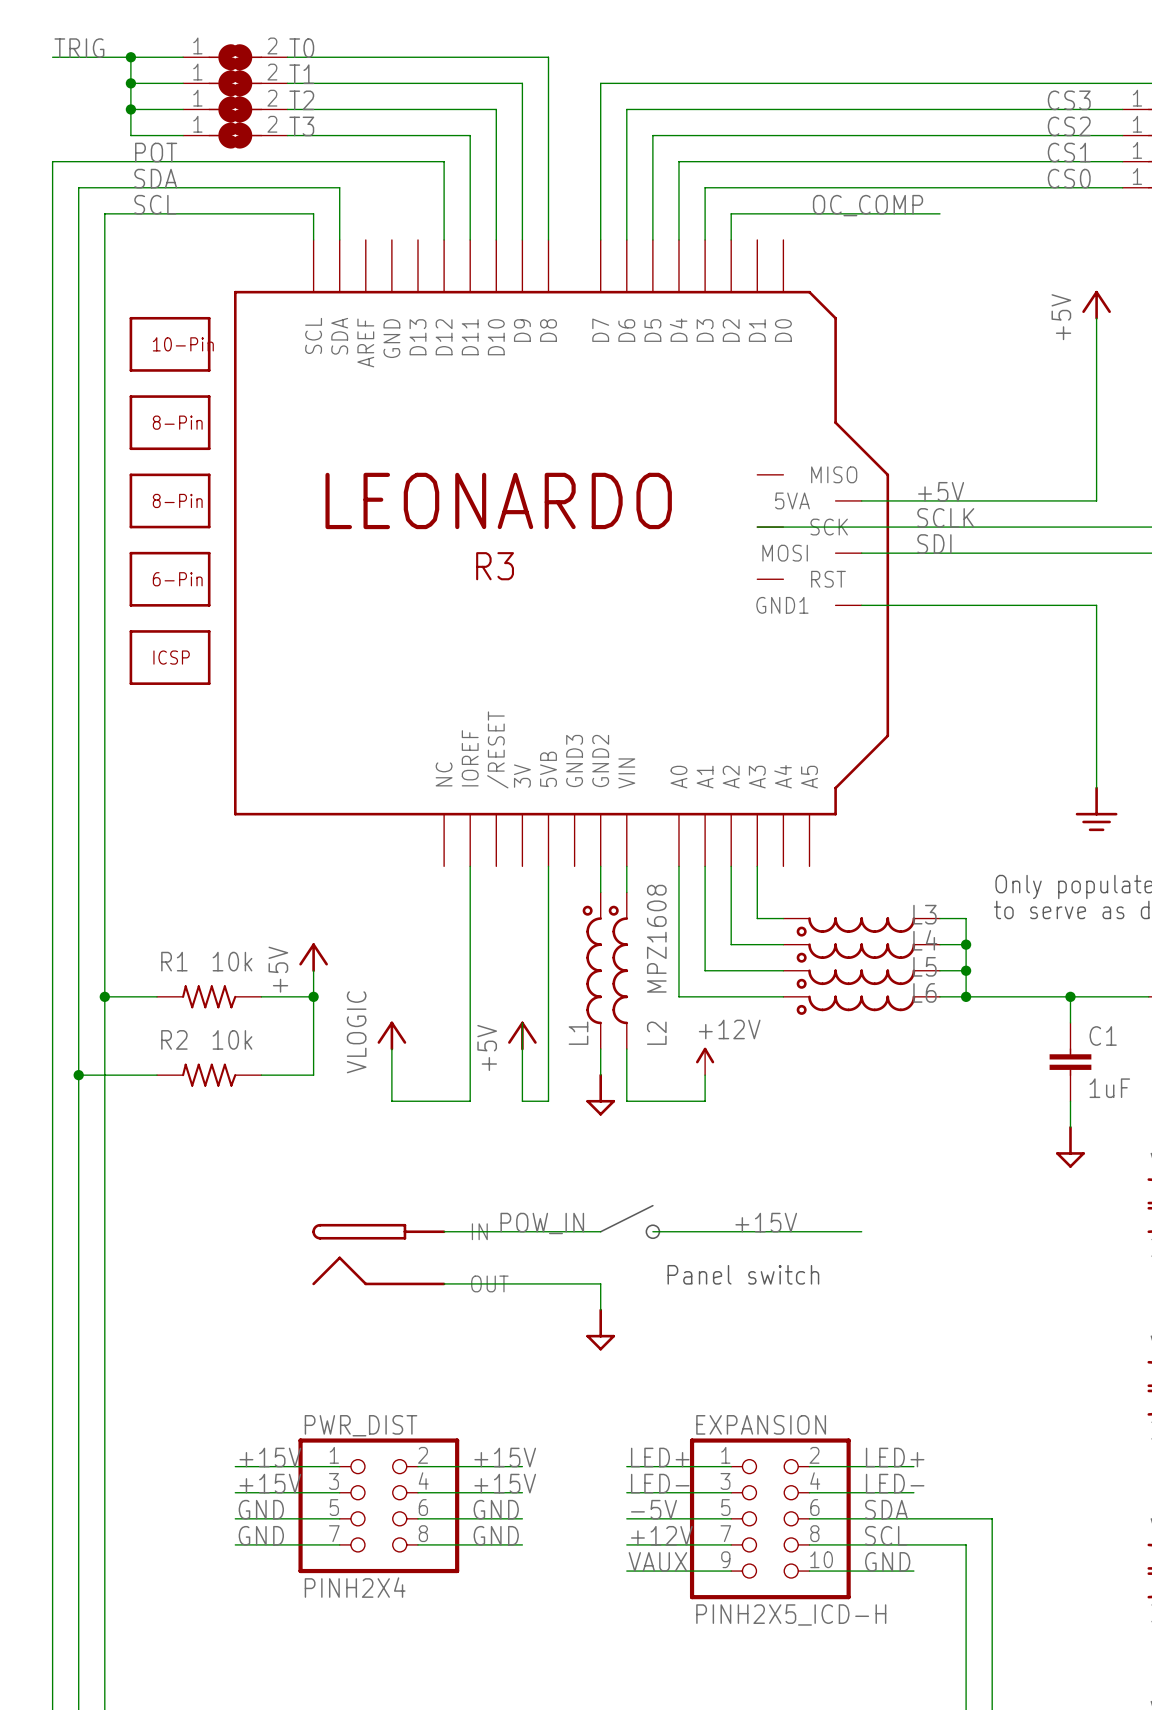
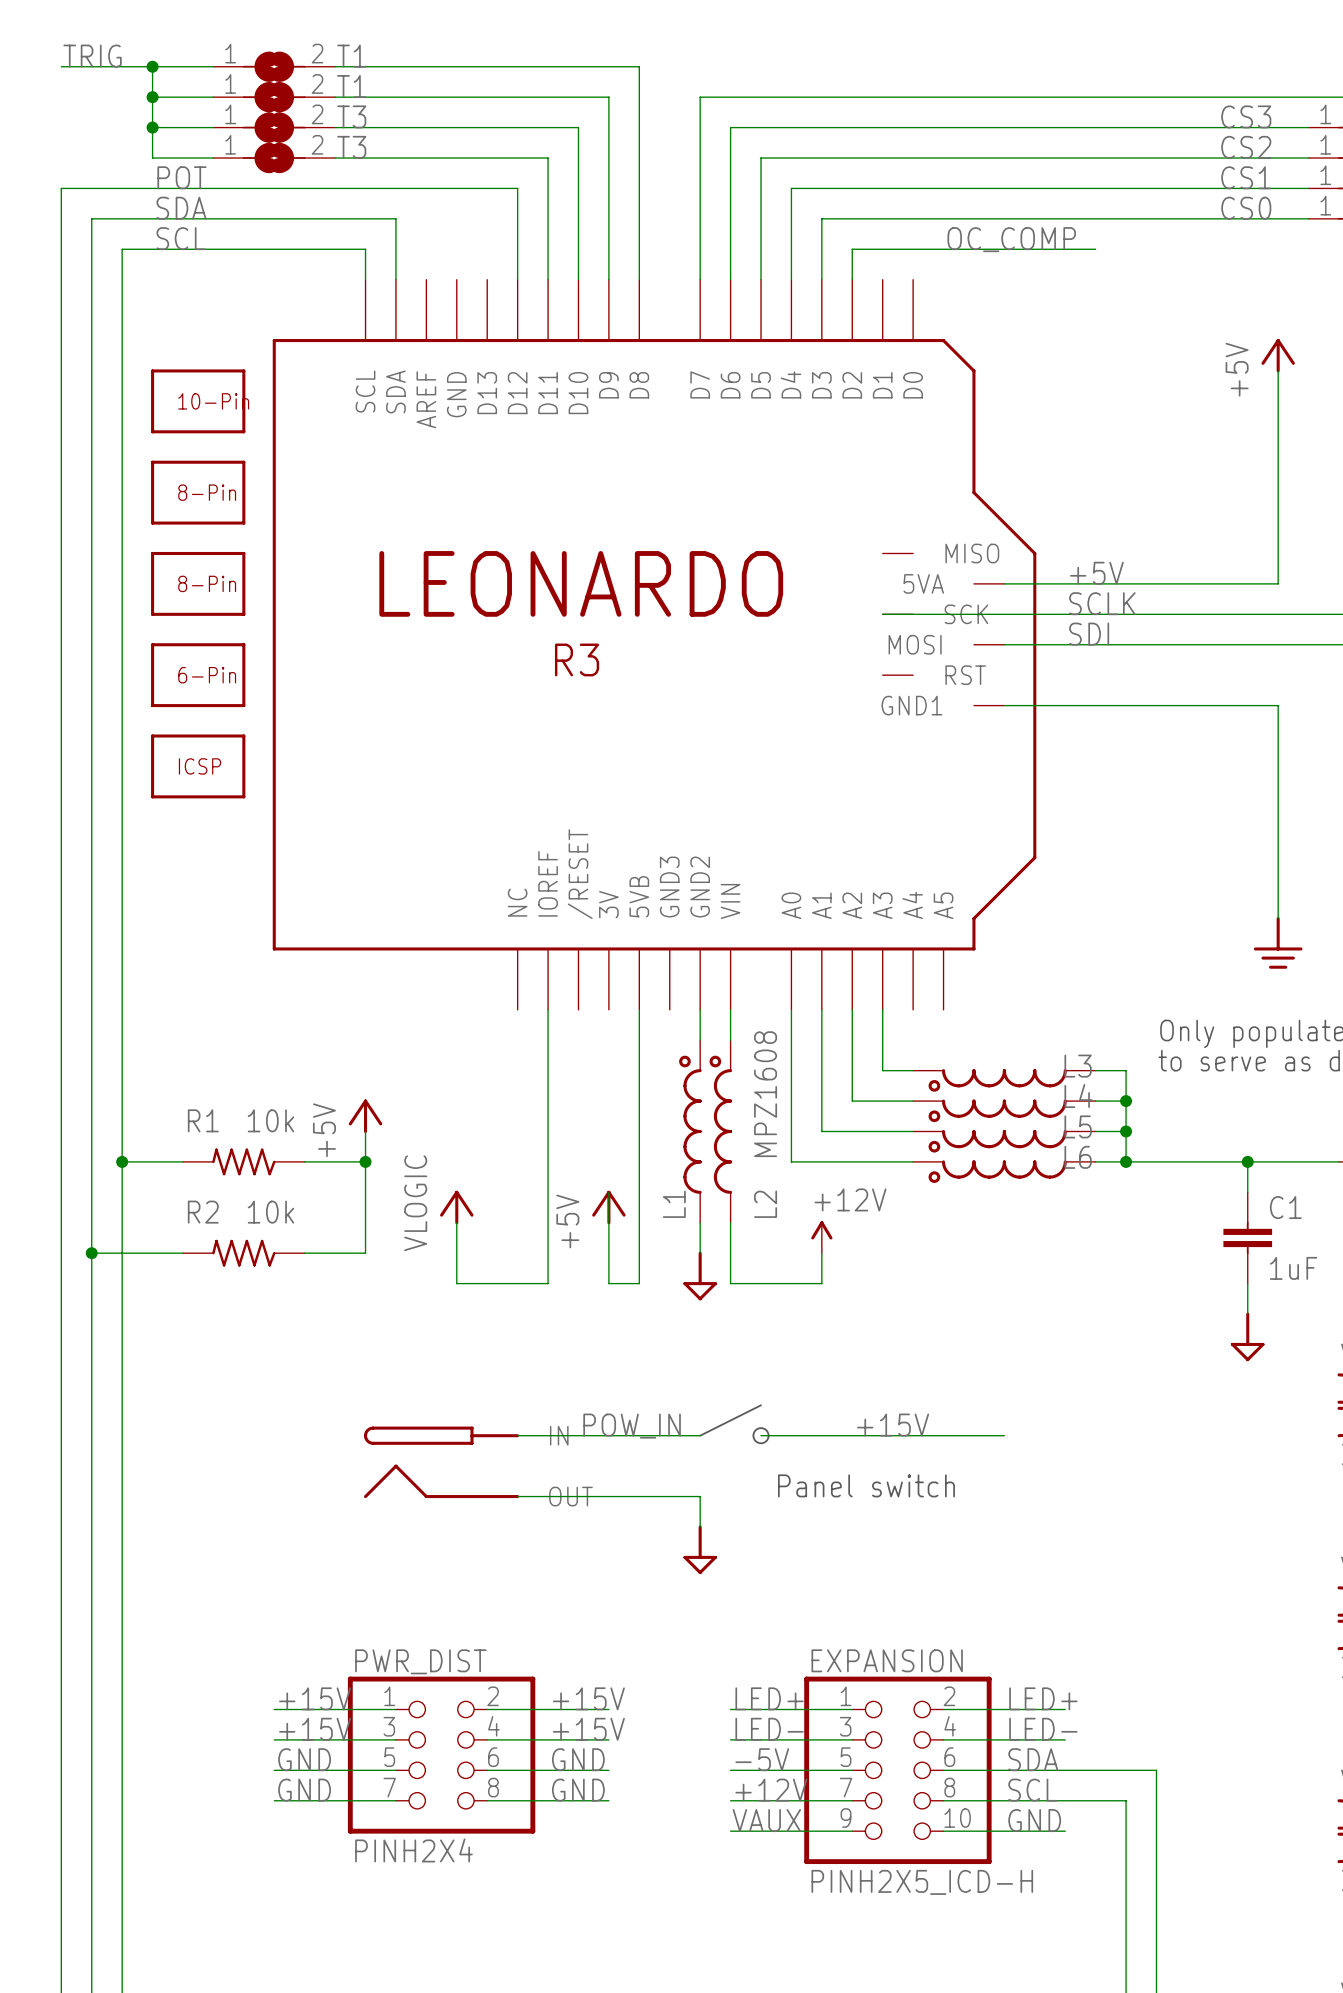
T0 name: T0 (301, 48) -> T1 (351, 56)
T2 name: T2 (301, 100) -> T3 (351, 116)

